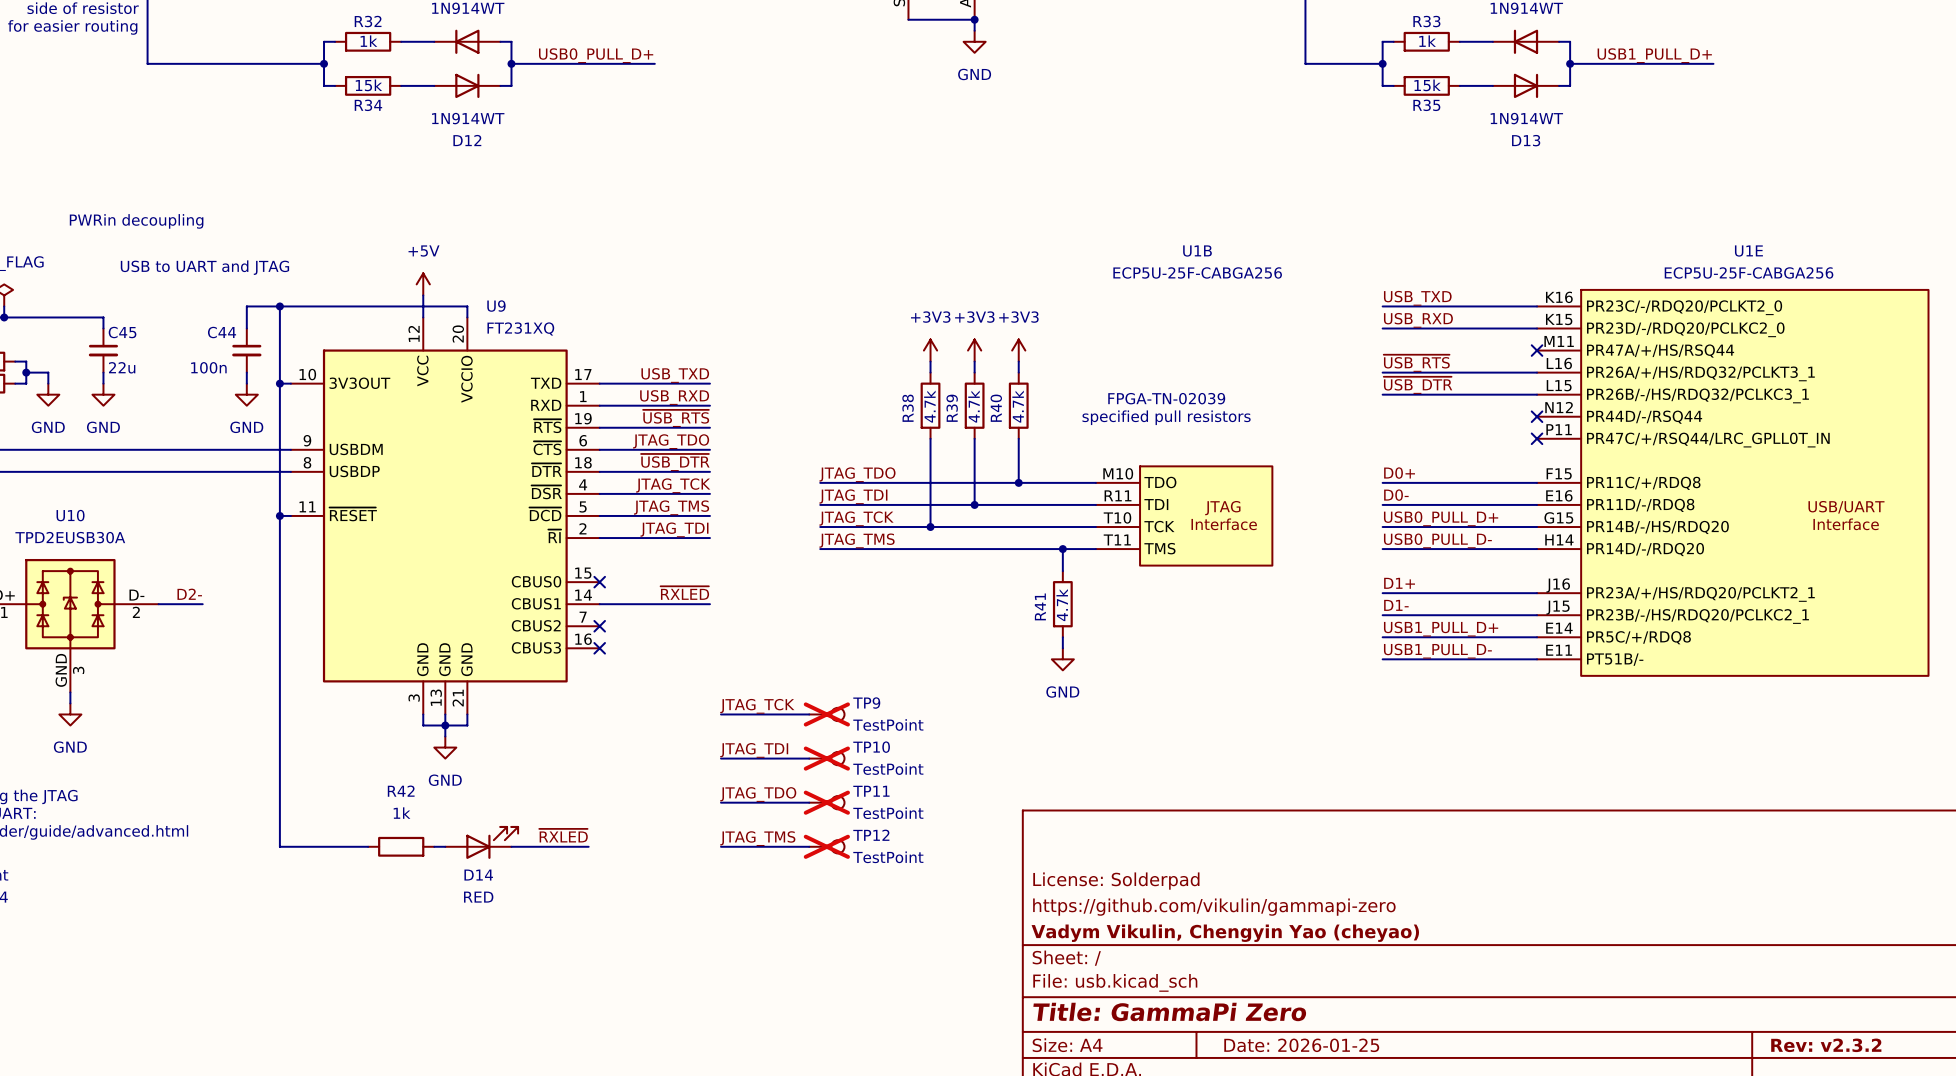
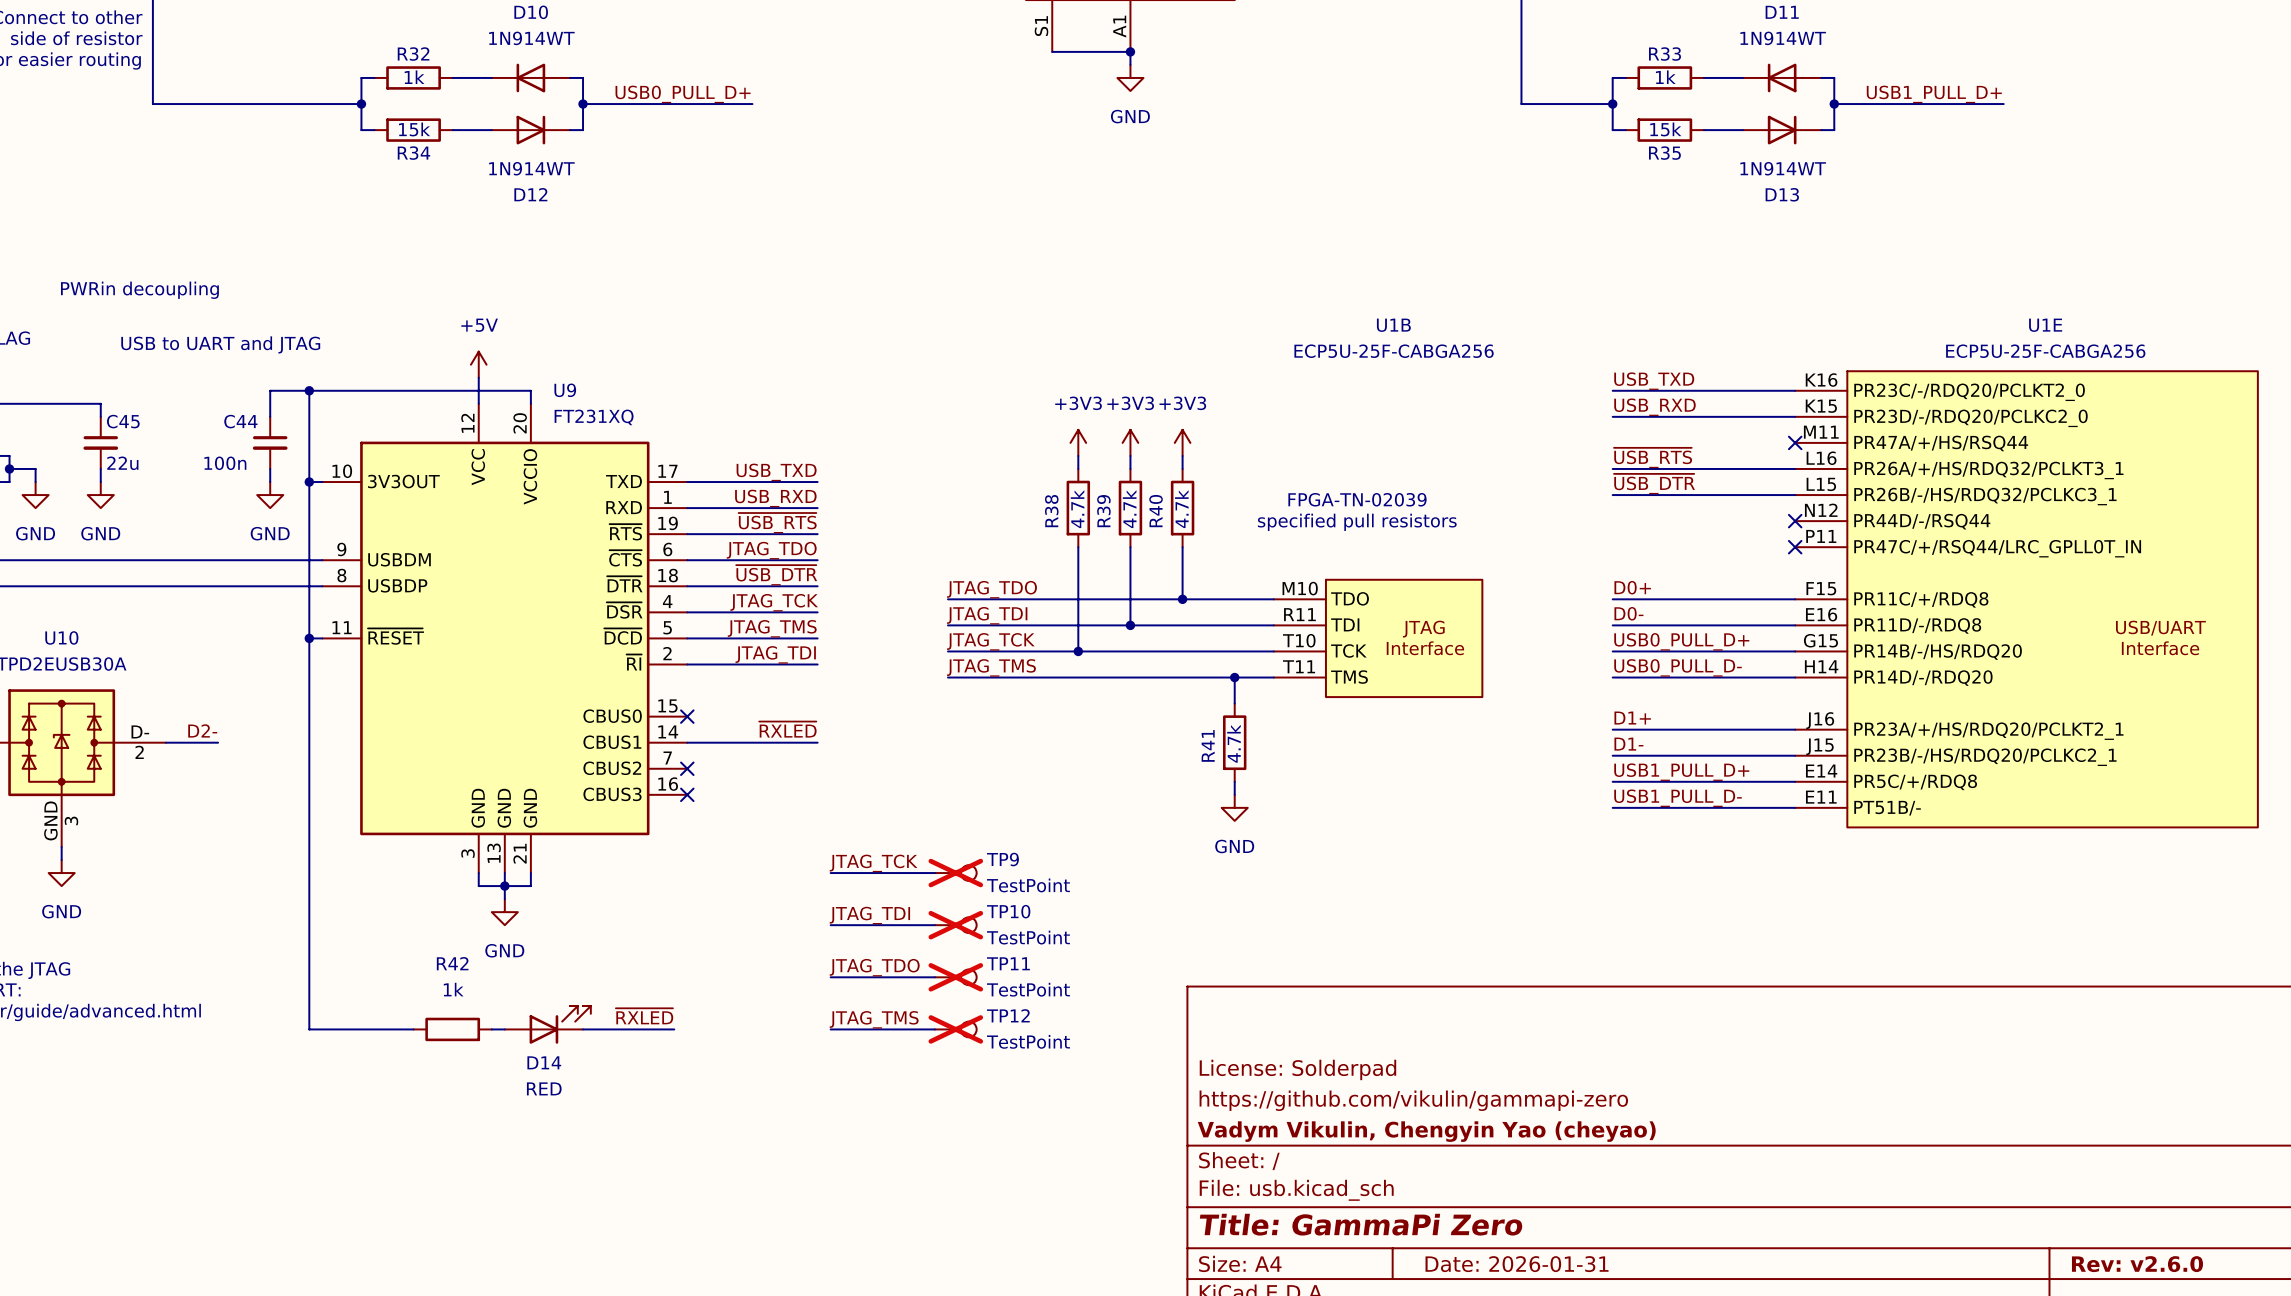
title block: Date: 2026-01-25 (1301, 1045) -> Date: 2026-01-31 (1517, 1264)
title block: Rev: v2.3.2 (1826, 1045) -> Rev: v2.6.0 (2137, 1264)

